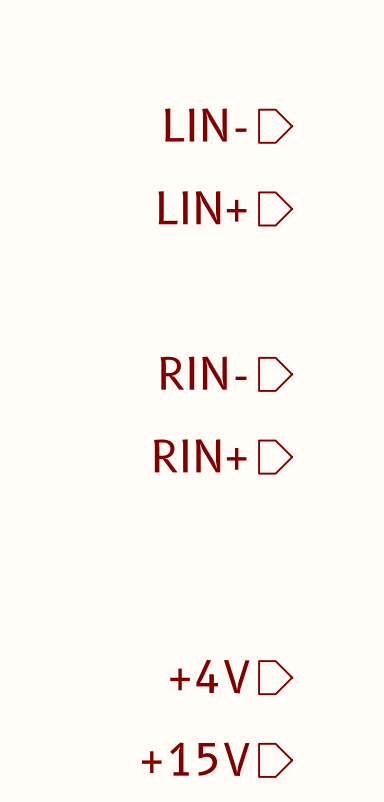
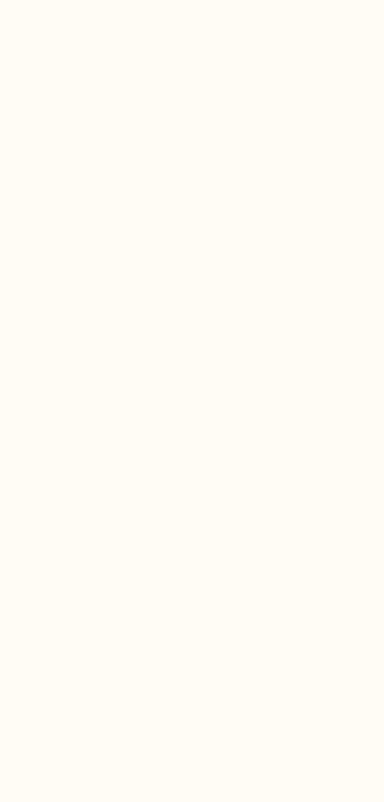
hierarchical label: LIN- (205, 125) -> none
hierarchical label: LIN+ (202, 207) -> none
hierarchical label: RIN- (203, 373) -> none
hierarchical label: RIN+ (200, 455) -> none
hierarchical label: +4V (209, 676) -> none
hierarchical label: +15V (195, 759) -> none

